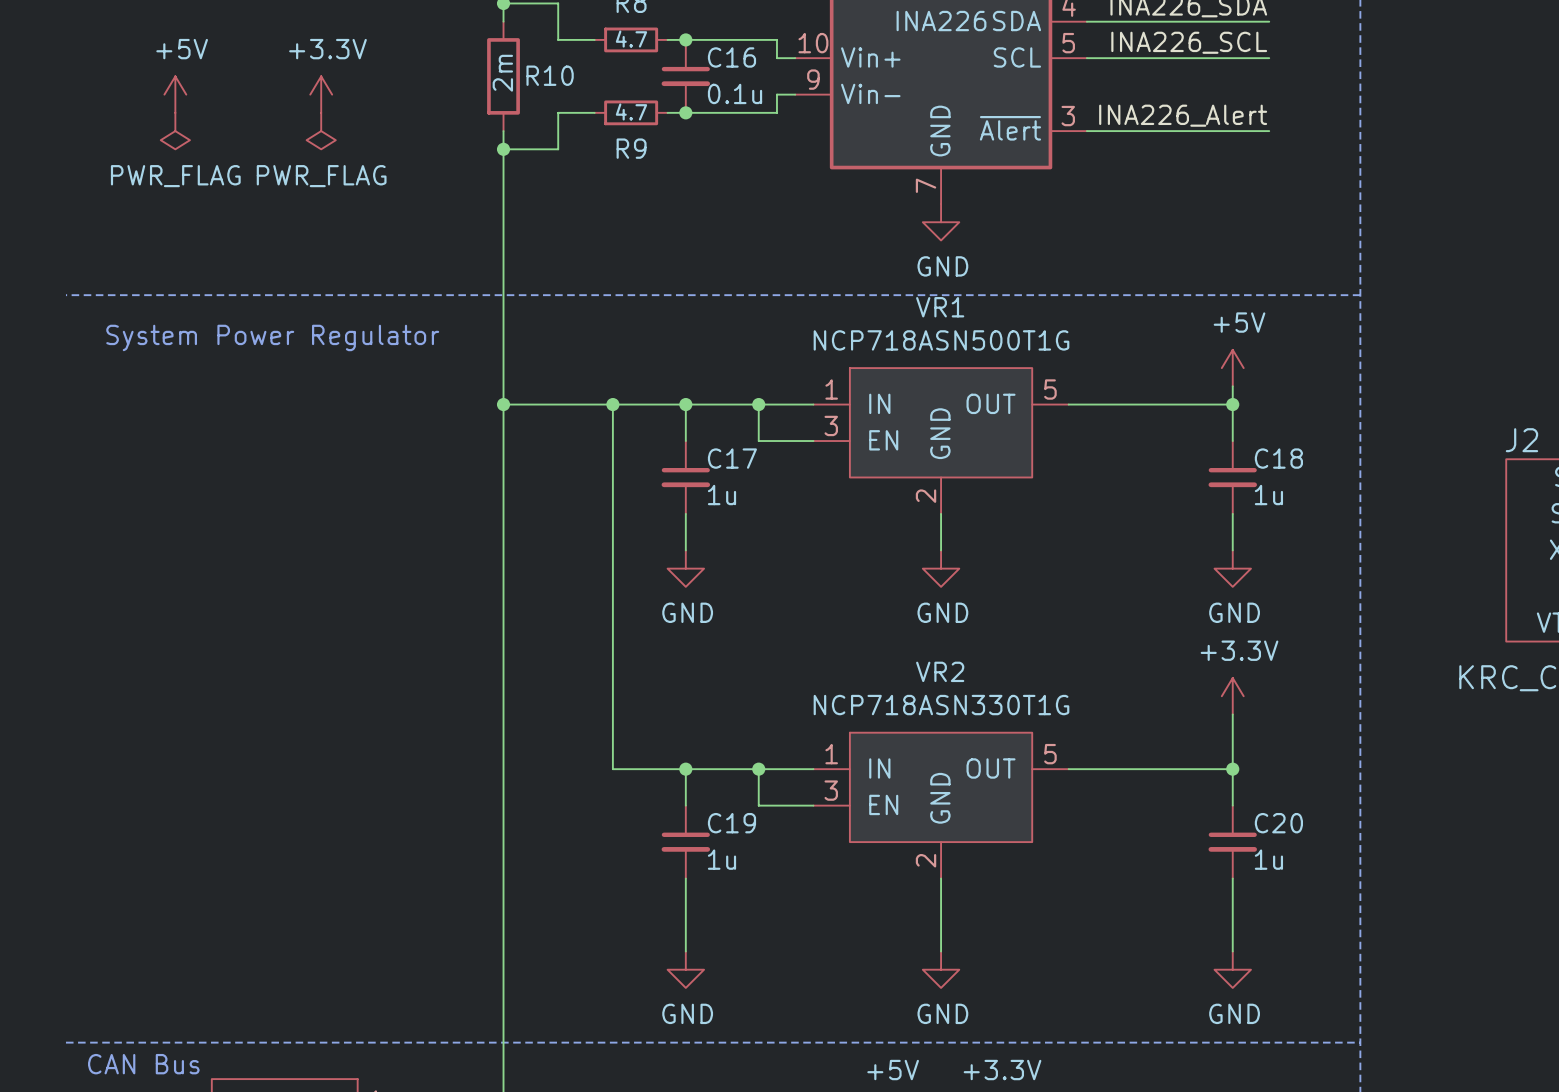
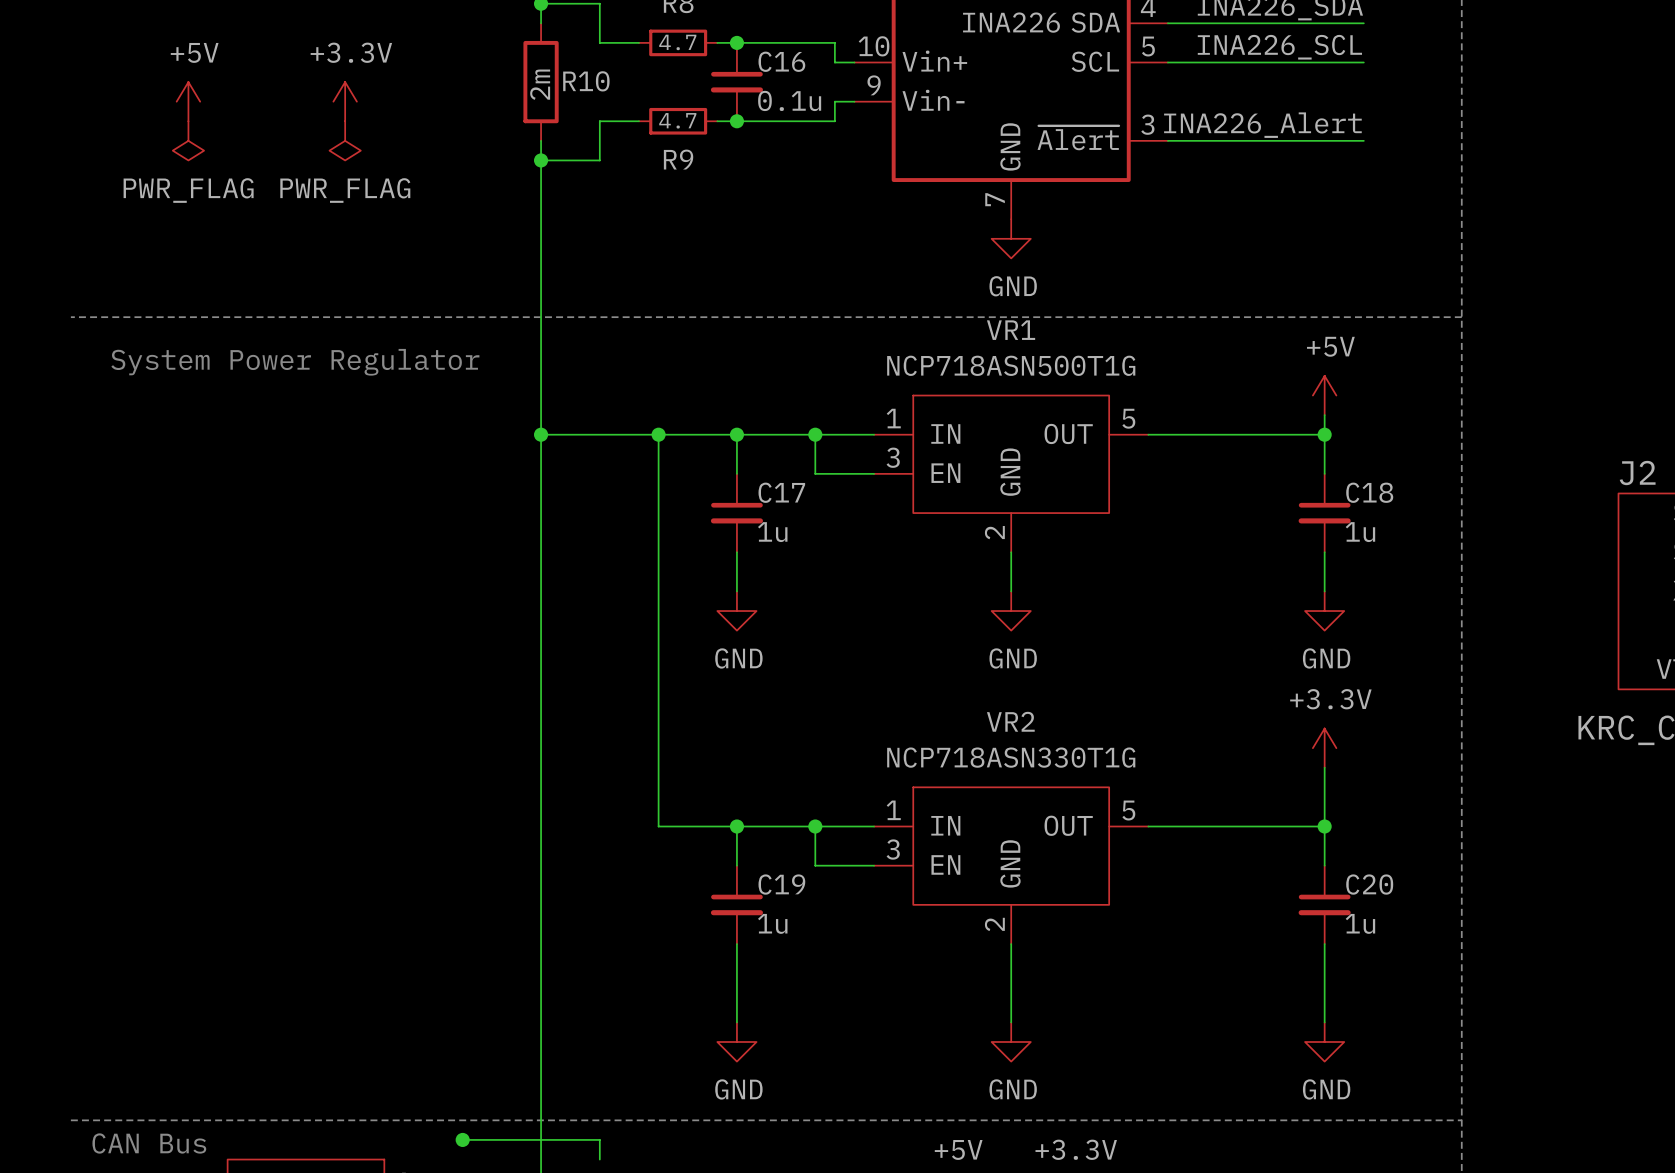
wire: none -> (462, 1139) (599, 1139) (599, 1159)
junction: none -> (462, 1139)

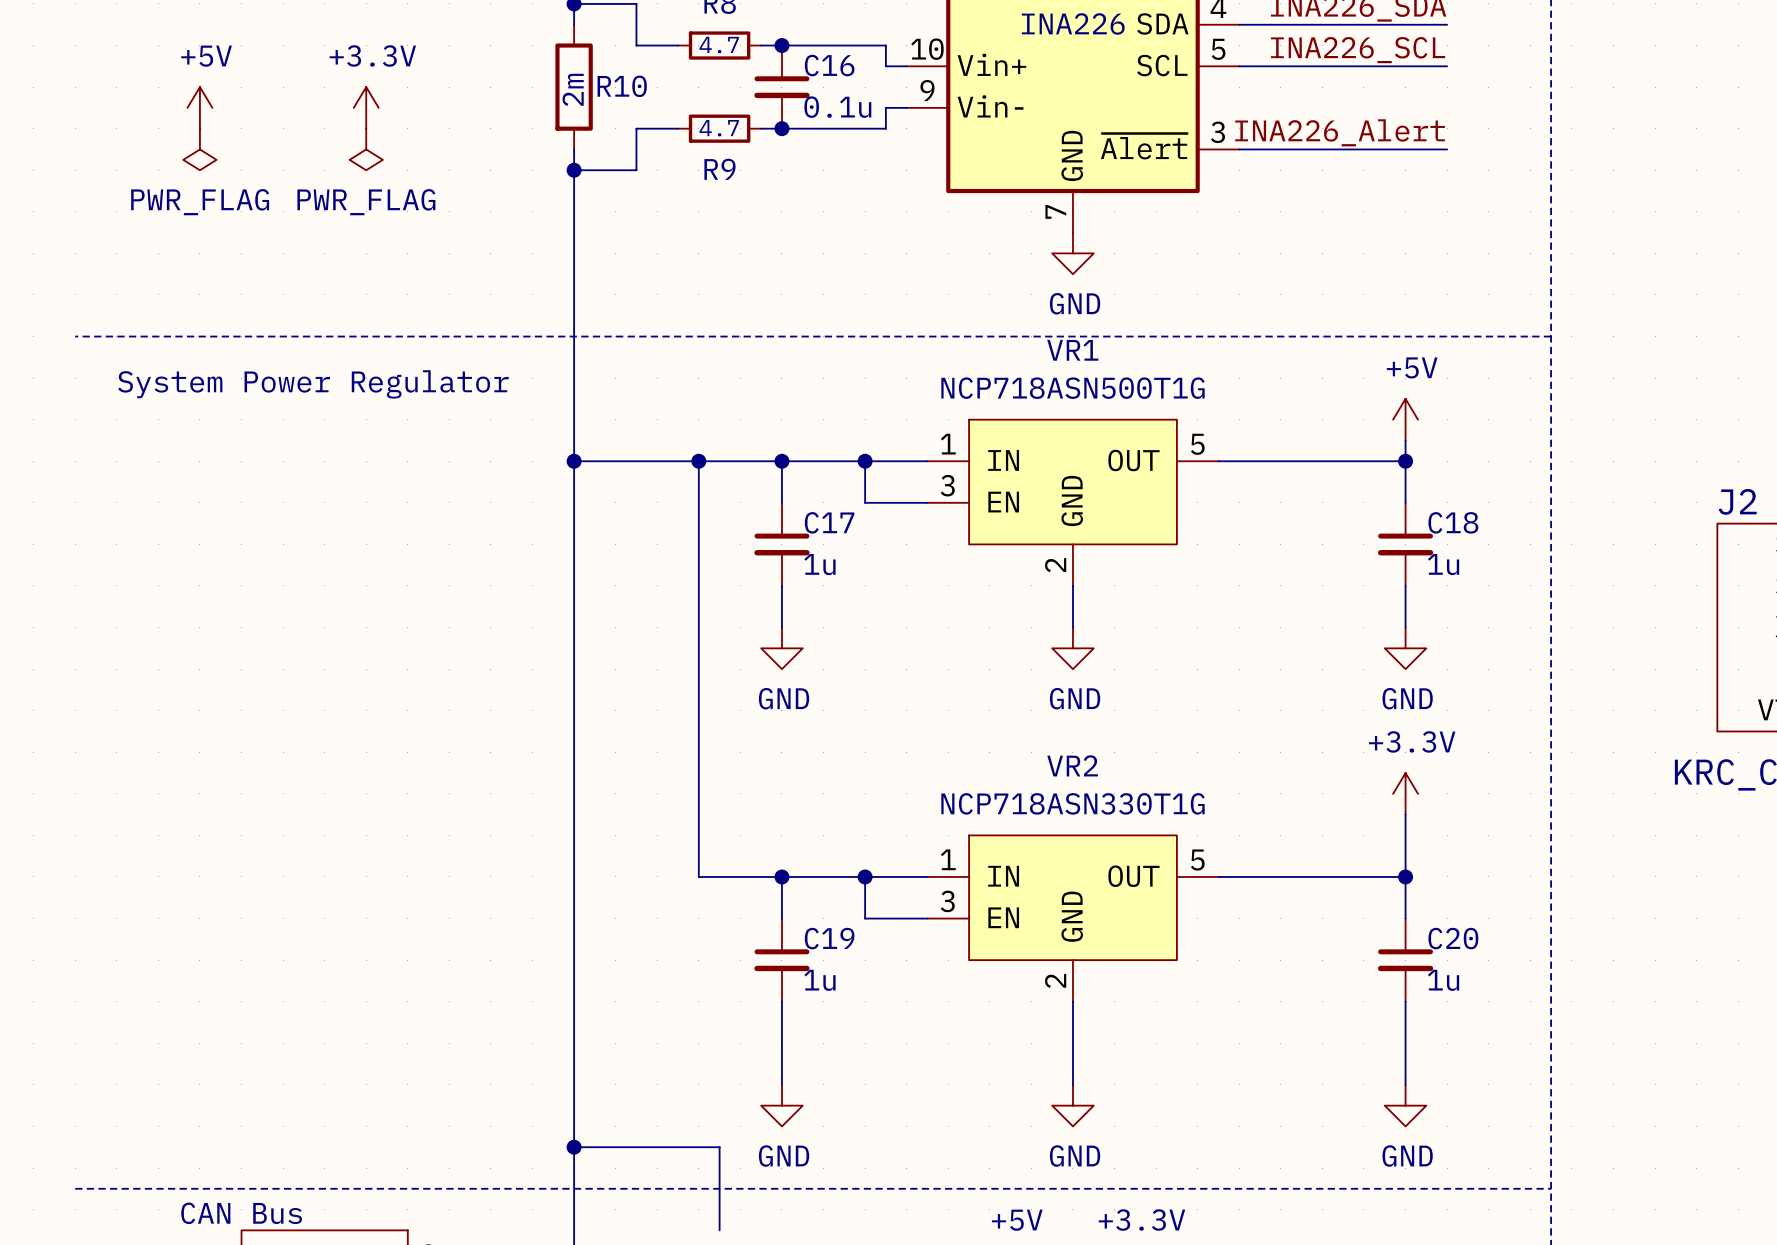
wire: none -> (574, 1147) (719, 1147) (719, 1230)
junction: none -> (574, 1147)
wire: (462, 1139) (599, 1139) (599, 1159) -> none
junction: (462, 1139) -> none
text position: CAN Bus (149, 1143) -> CAN Bus (241, 1213)

